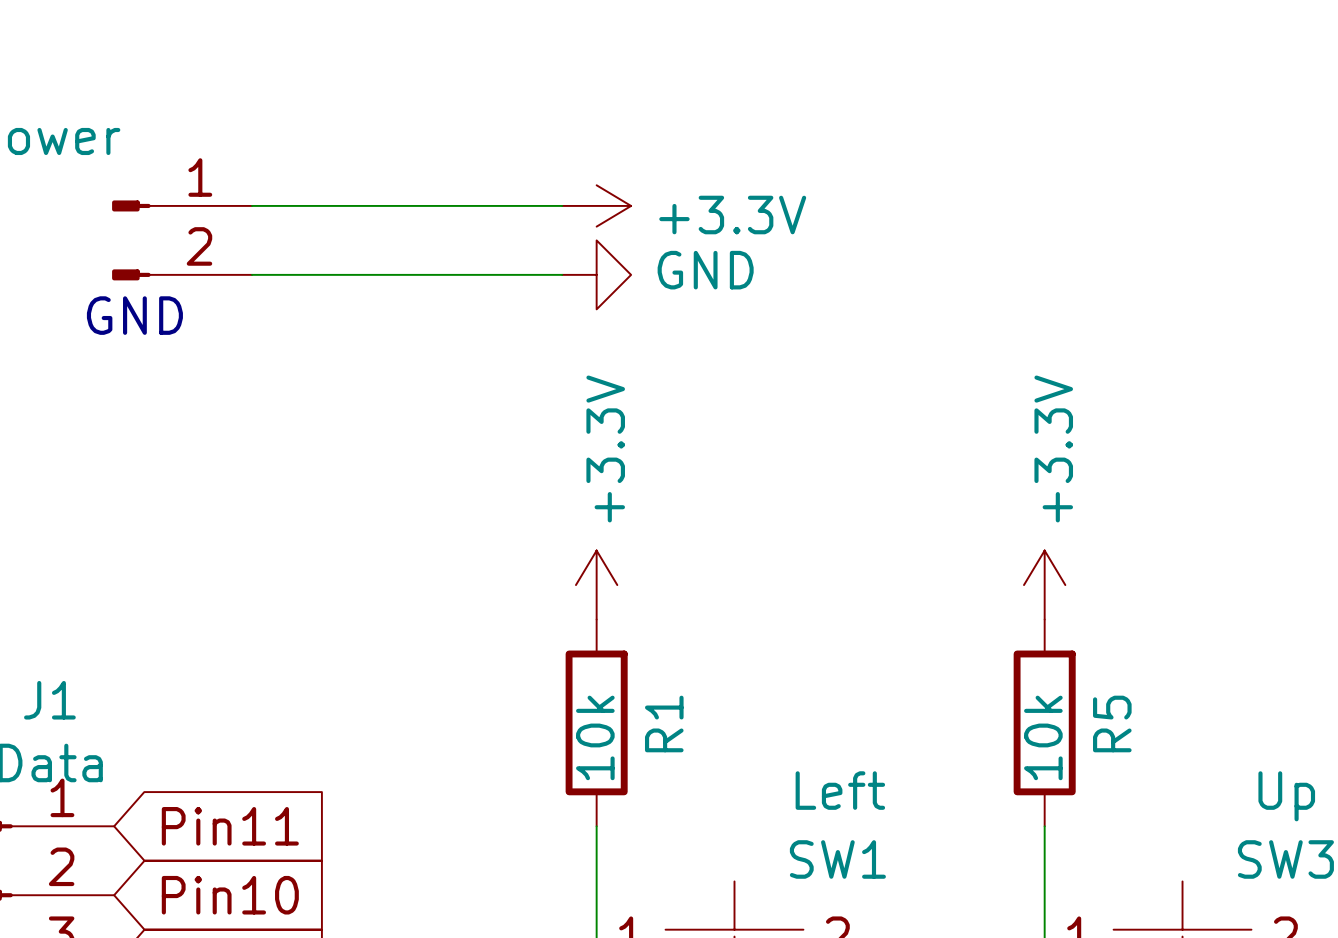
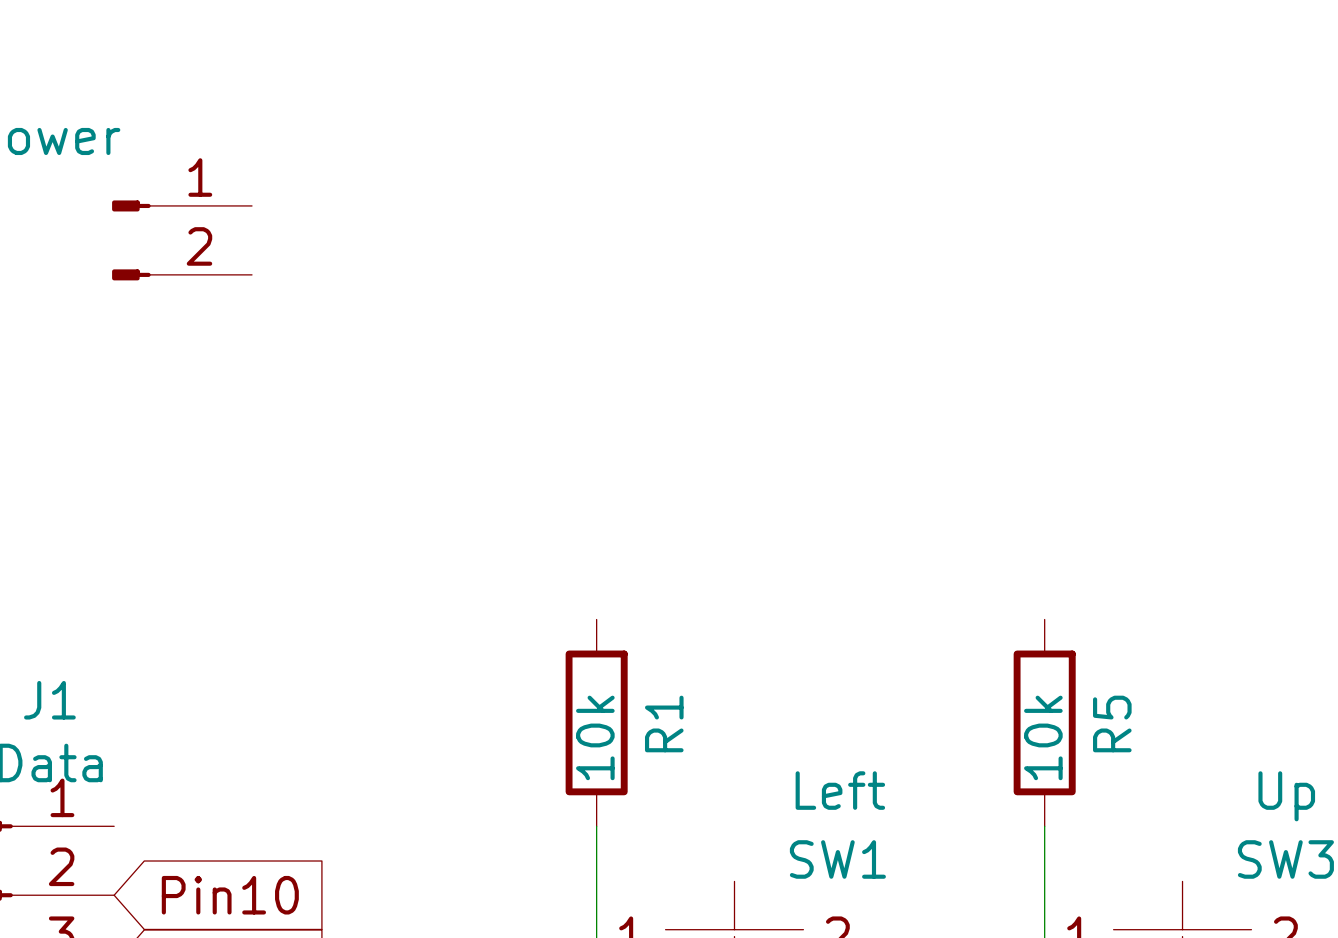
wire: (252, 205) (562, 205) -> none
power symbol: +3.3V (596, 205) -> none
wire: (252, 274) (562, 274) -> none
power symbol: GND (596, 274) -> none
text: GND (134, 315) -> none
power symbol: +3.3V (596, 585) -> none
power symbol: +3.3V (1044, 585) -> none
global label: Pin11 (230, 826) -> none

